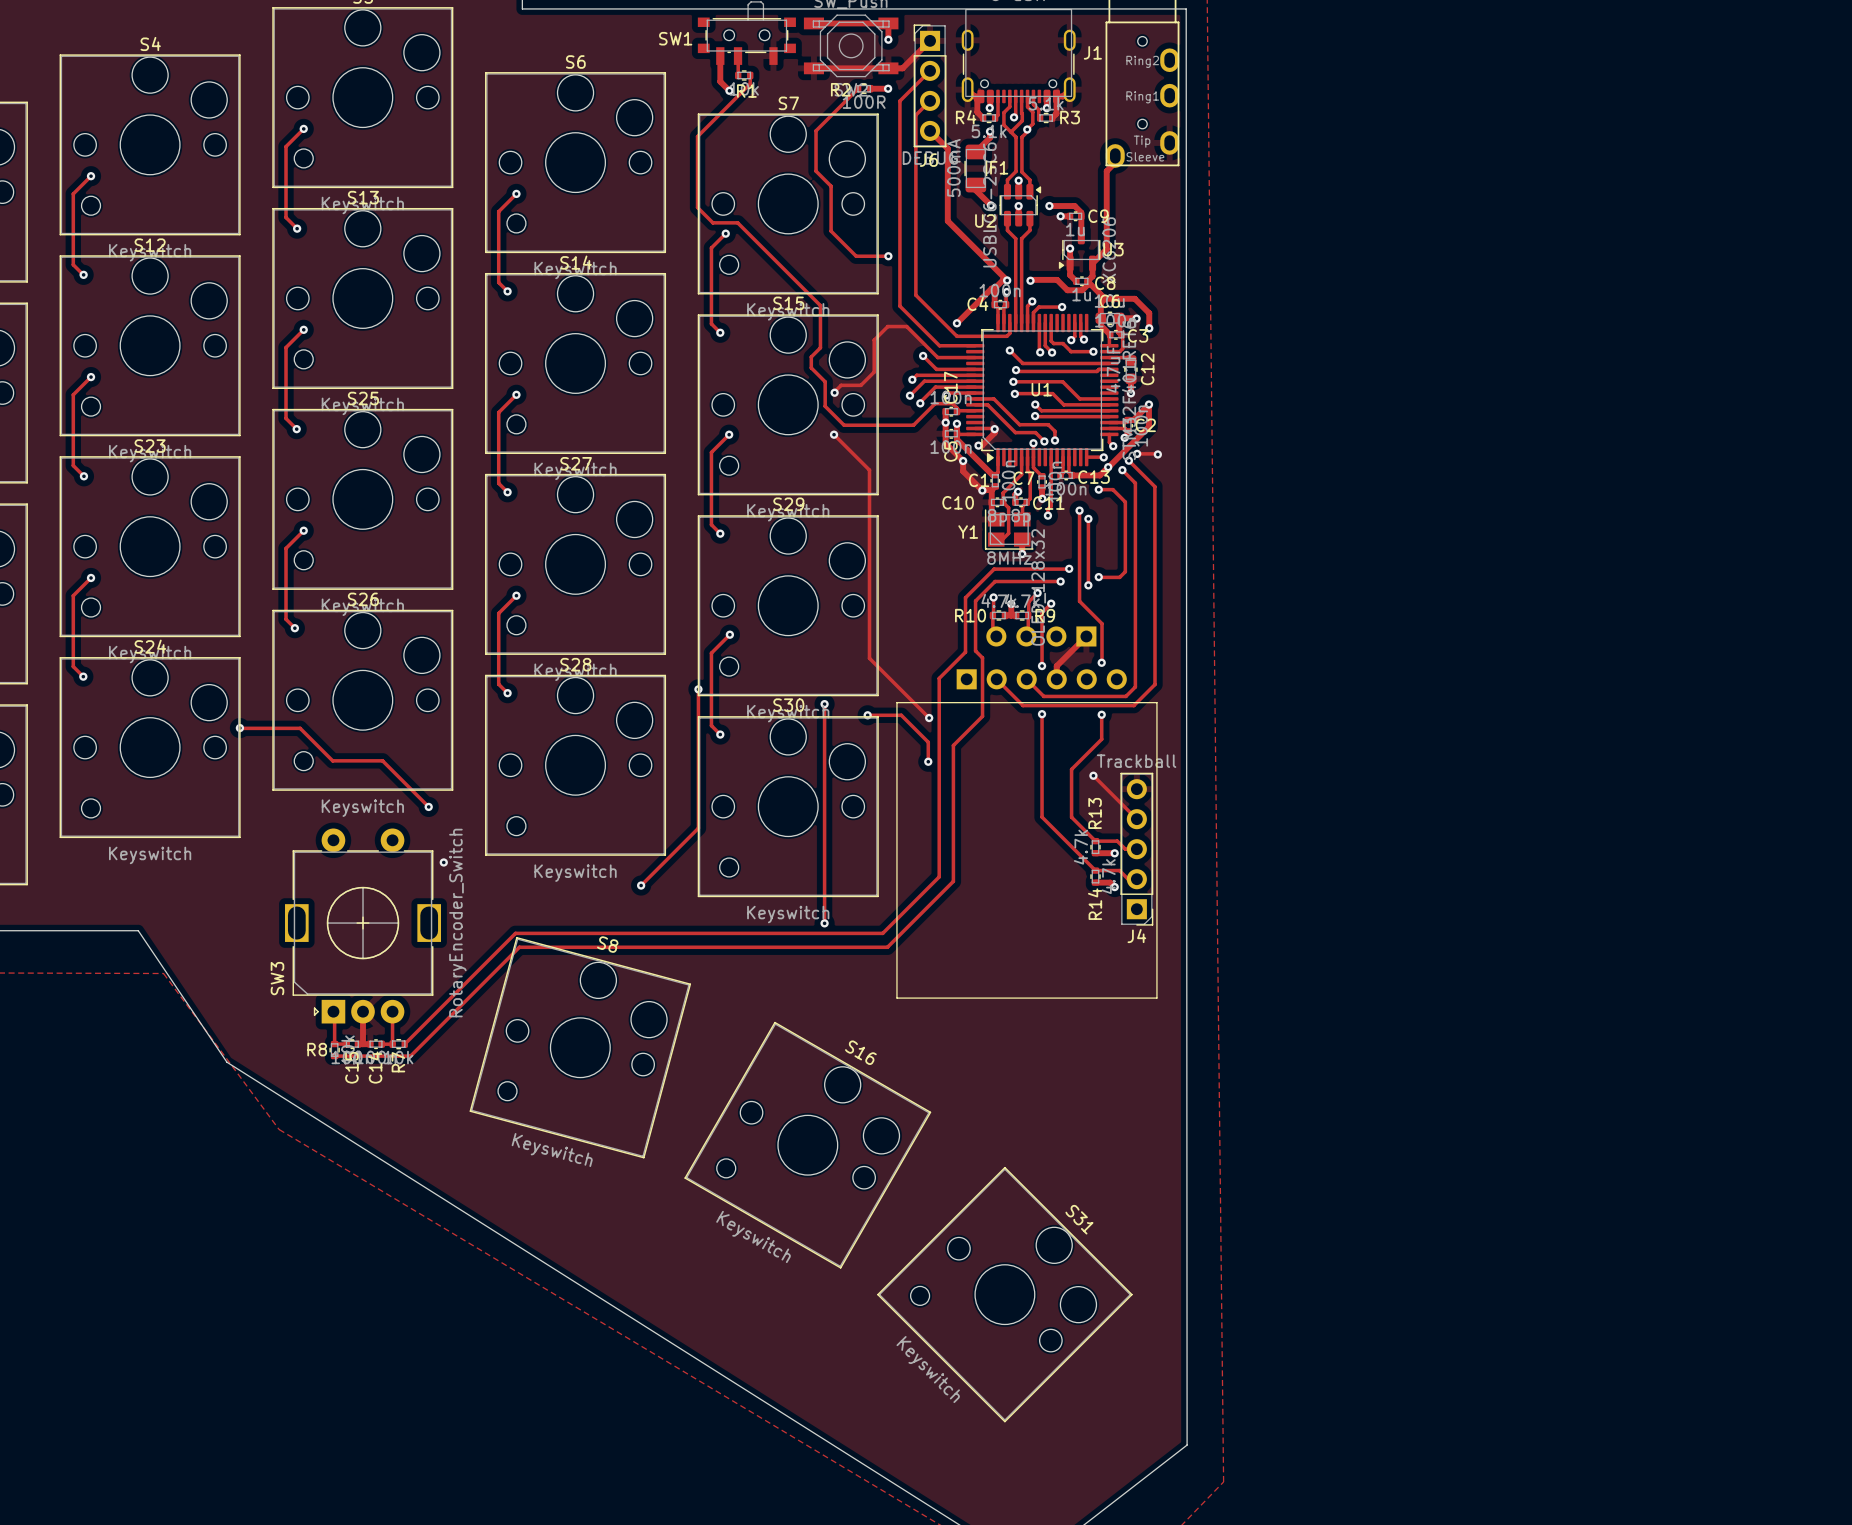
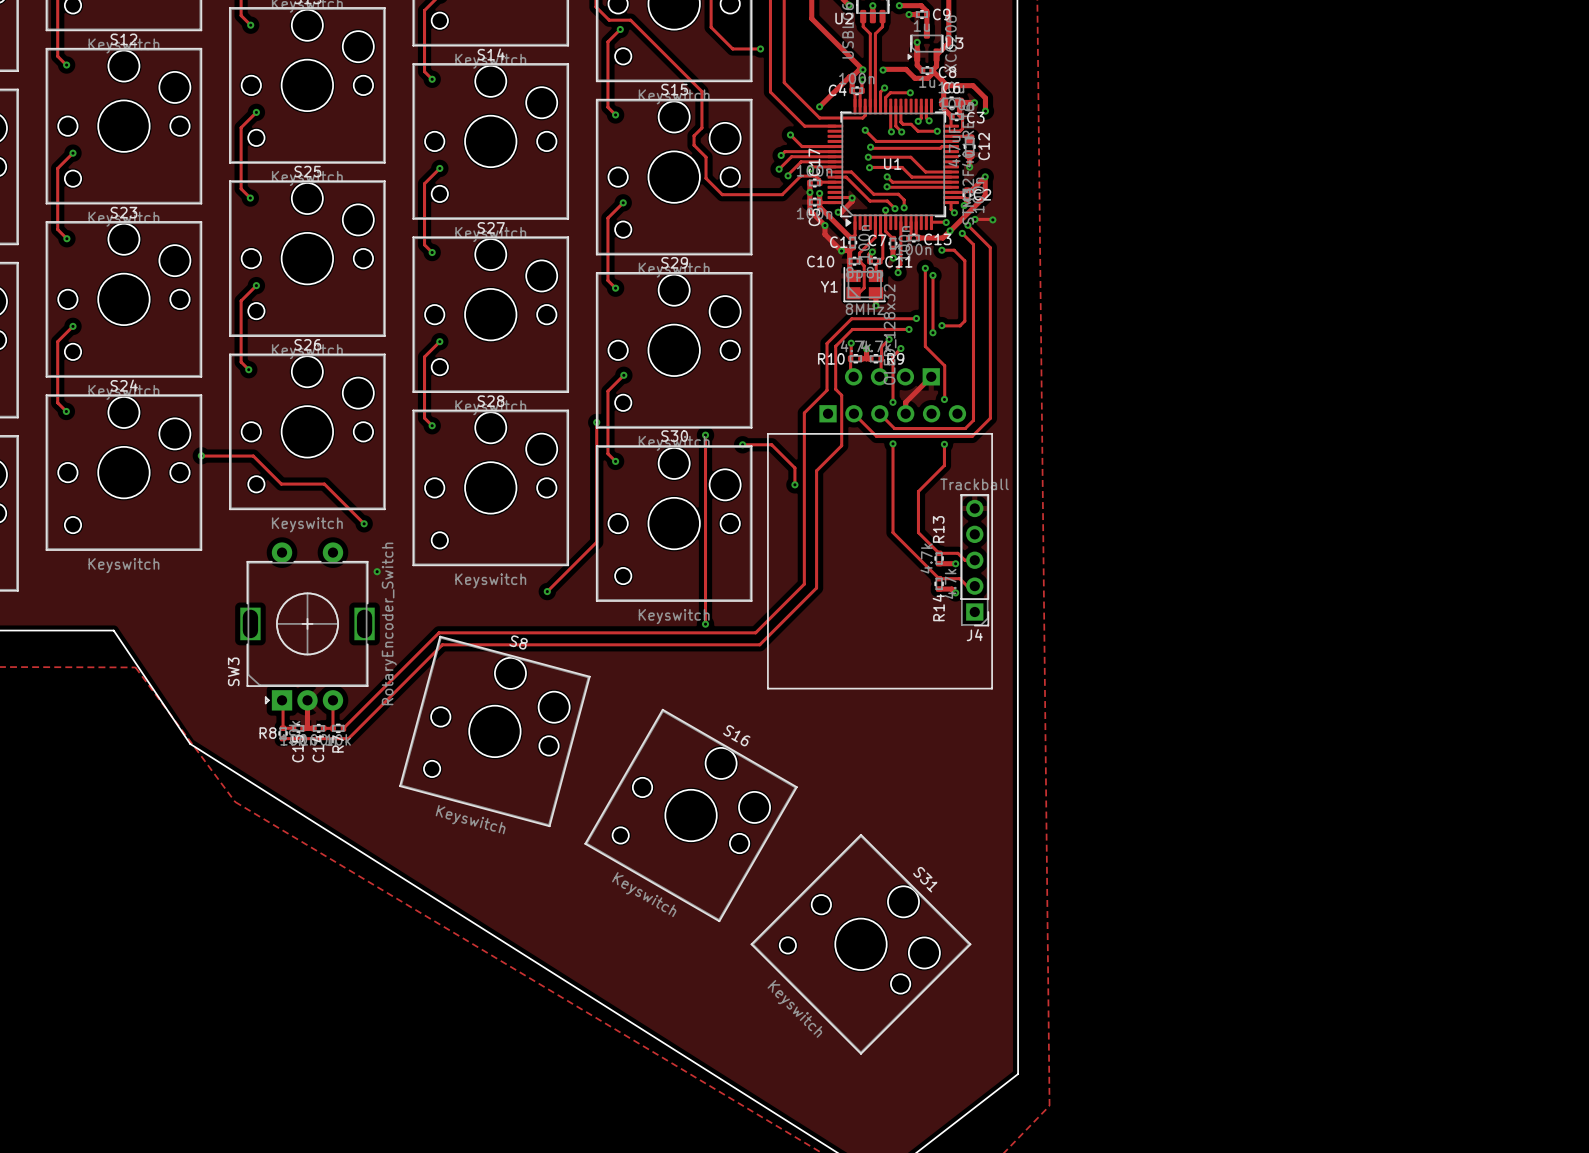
track: (975, 357) (937, 357) (906, 326) (887, 326) (874, 340) (874, 372) (860, 385) (841, 385) (834, 392) -> none
via: (834, 392) -> none
track: (834, 434) (869, 470) (869, 658) (929, 718) -> none
via: (834, 434) -> none
via: (929, 718) -> none
track: (1093, 775) (1136, 819) -> none
via: (1093, 775) -> none

